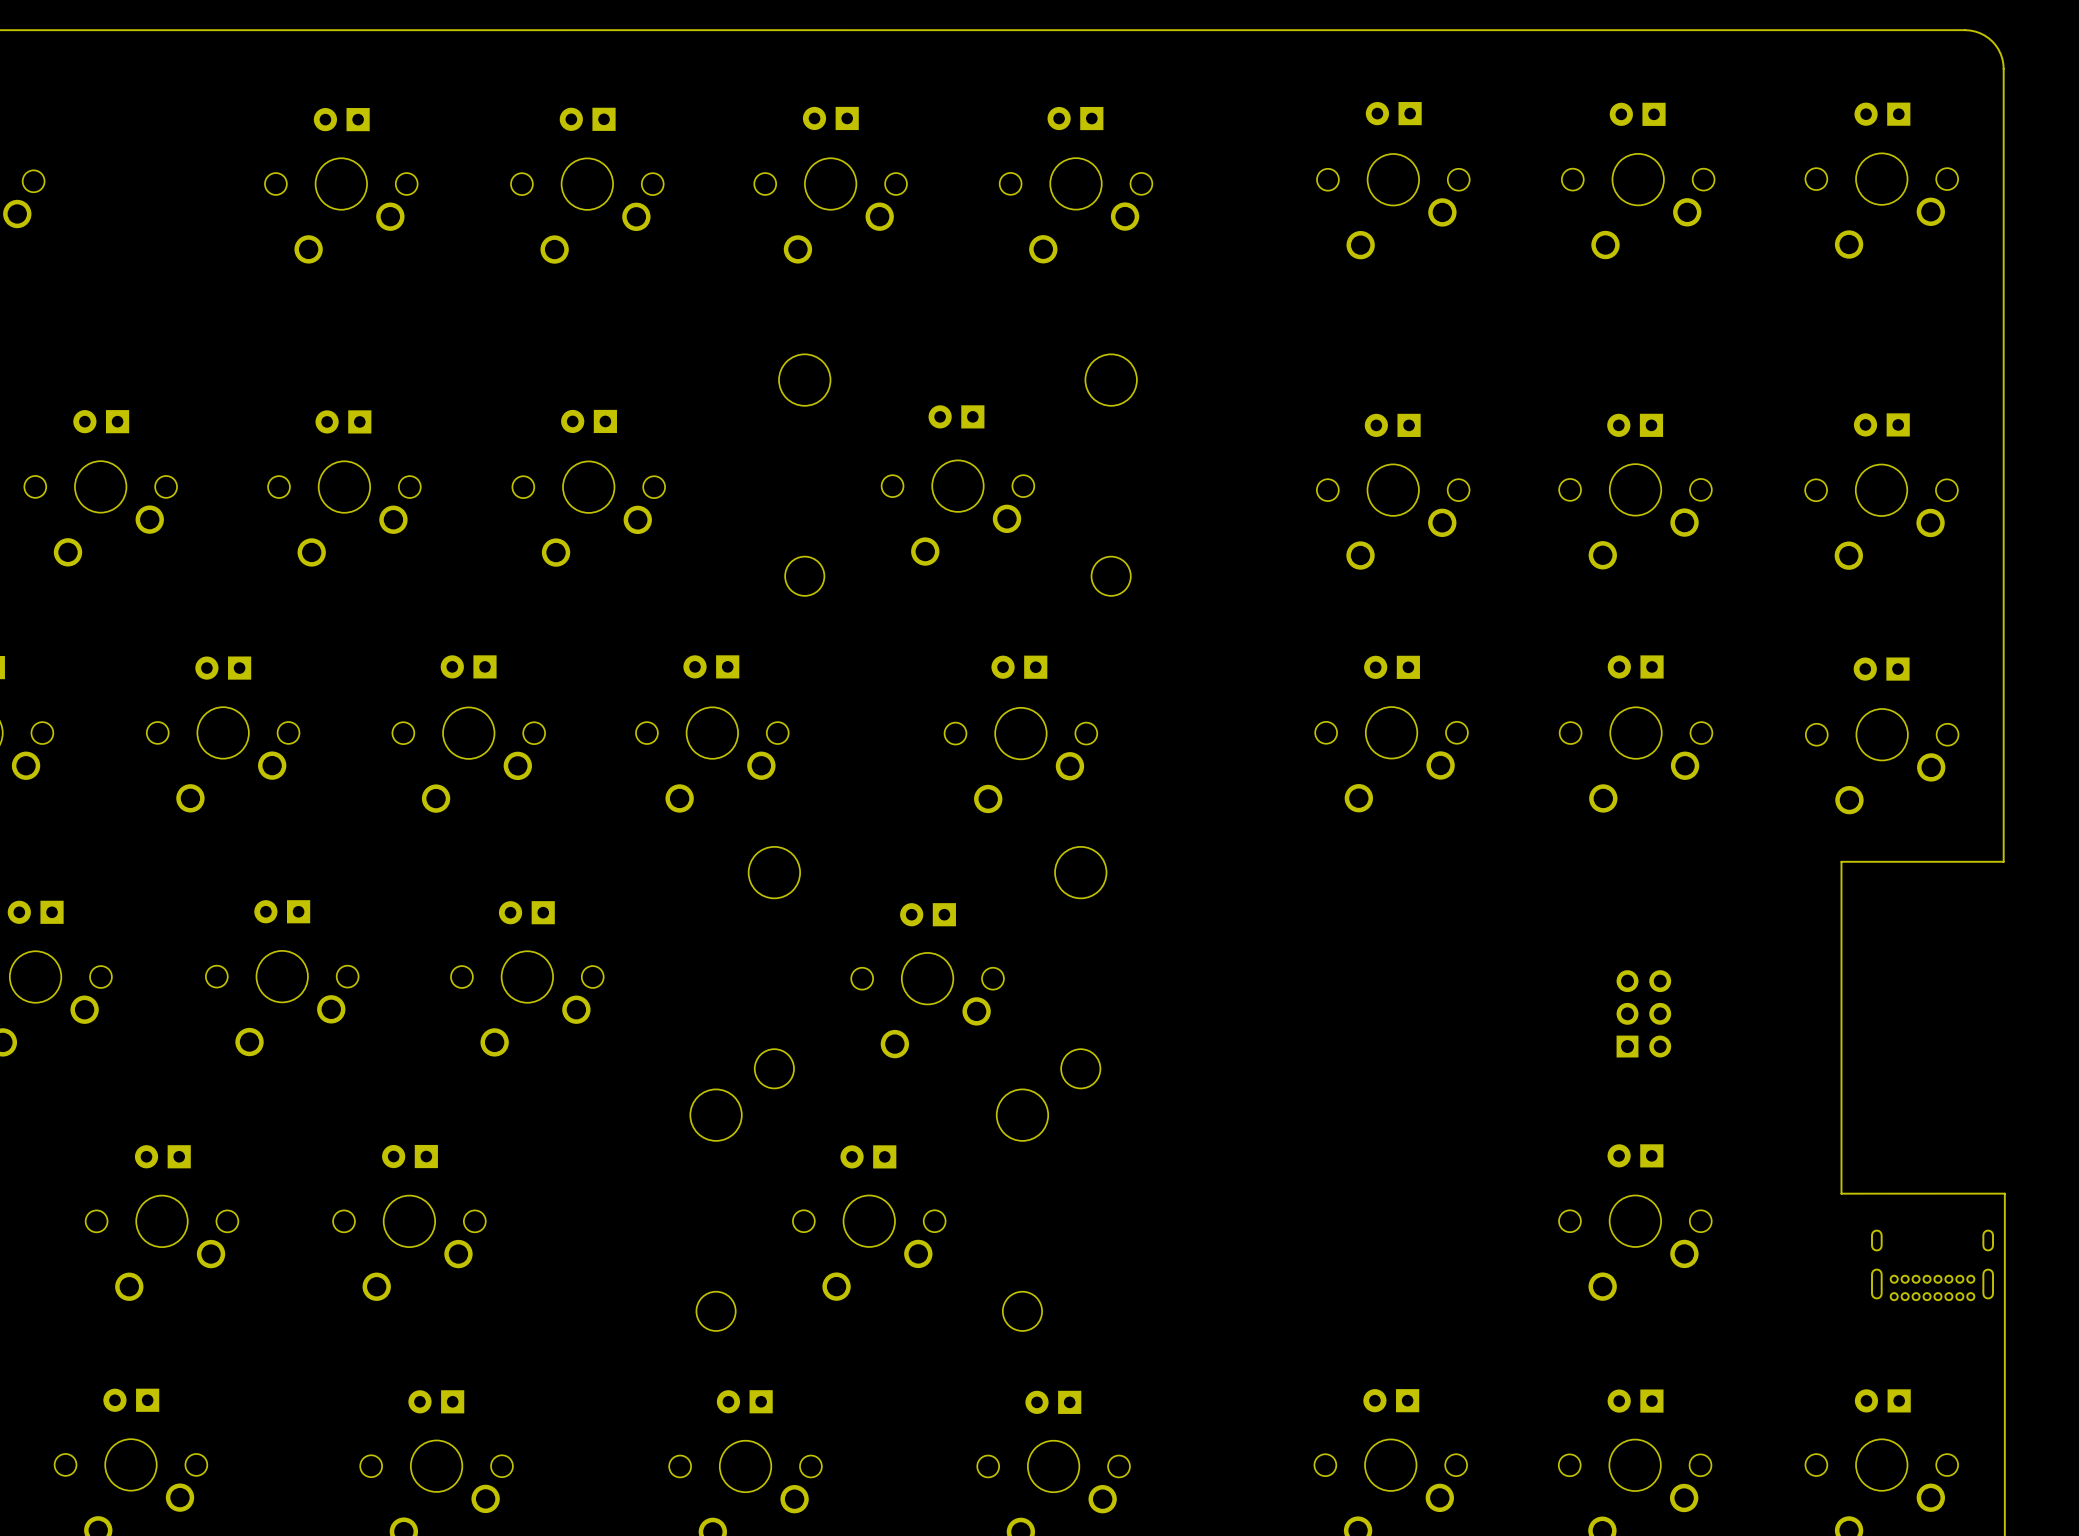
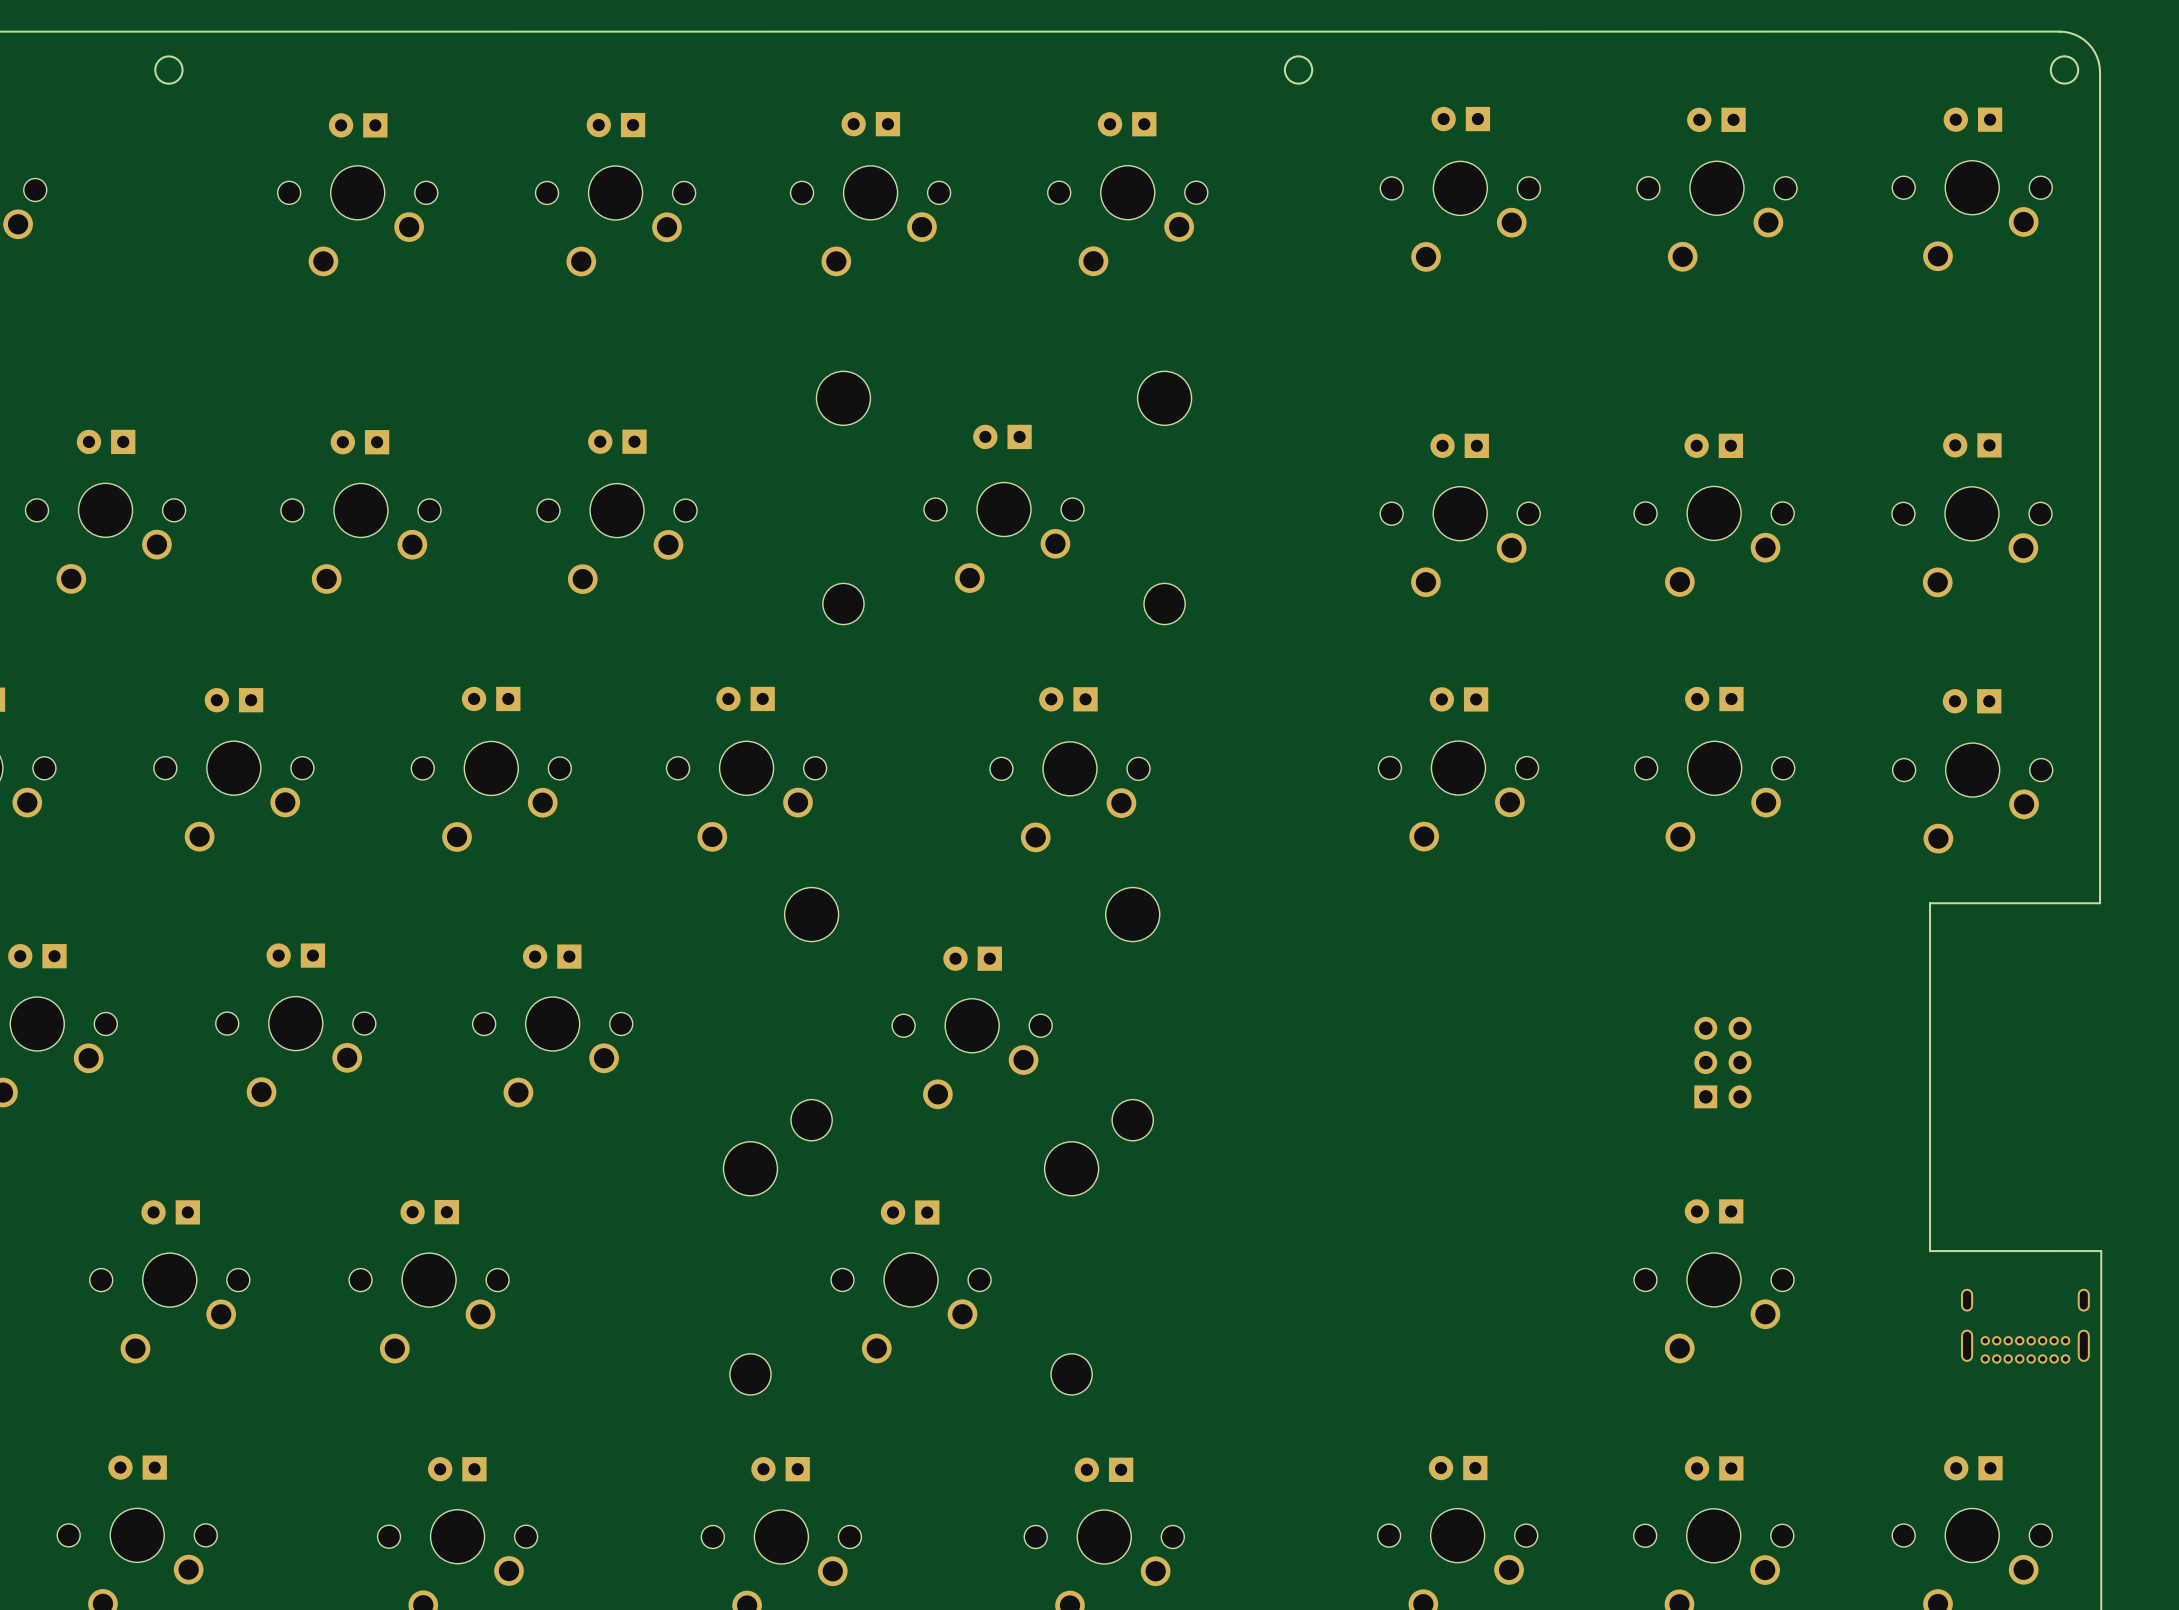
round board edge: none -> [154, 55, 184, 85]
round board edge: none -> [1283, 55, 1314, 85]
round board edge: none -> [2049, 55, 2080, 85]

